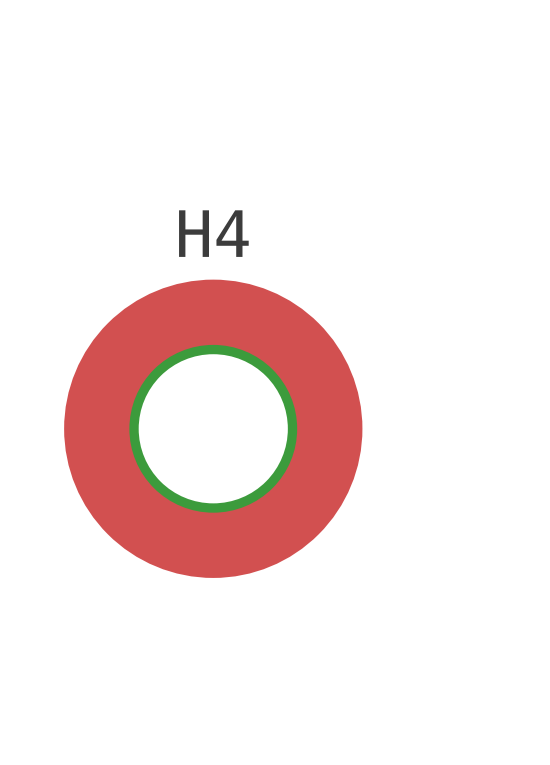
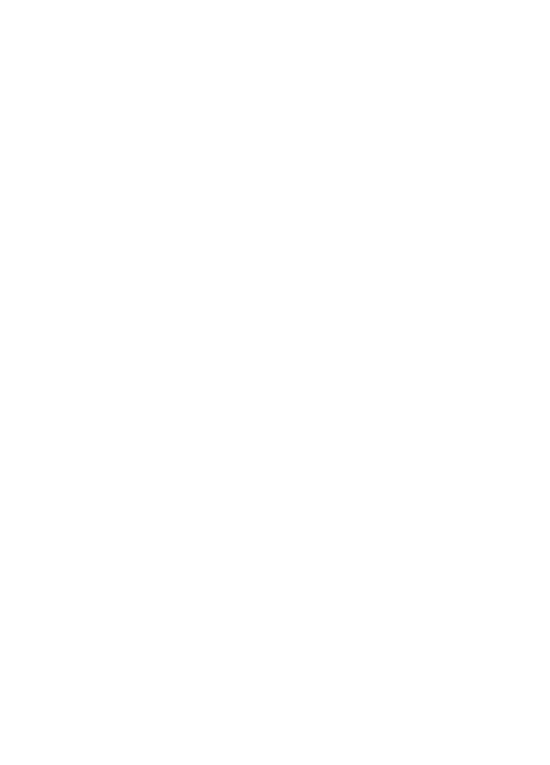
H4: (213, 428) -> none

